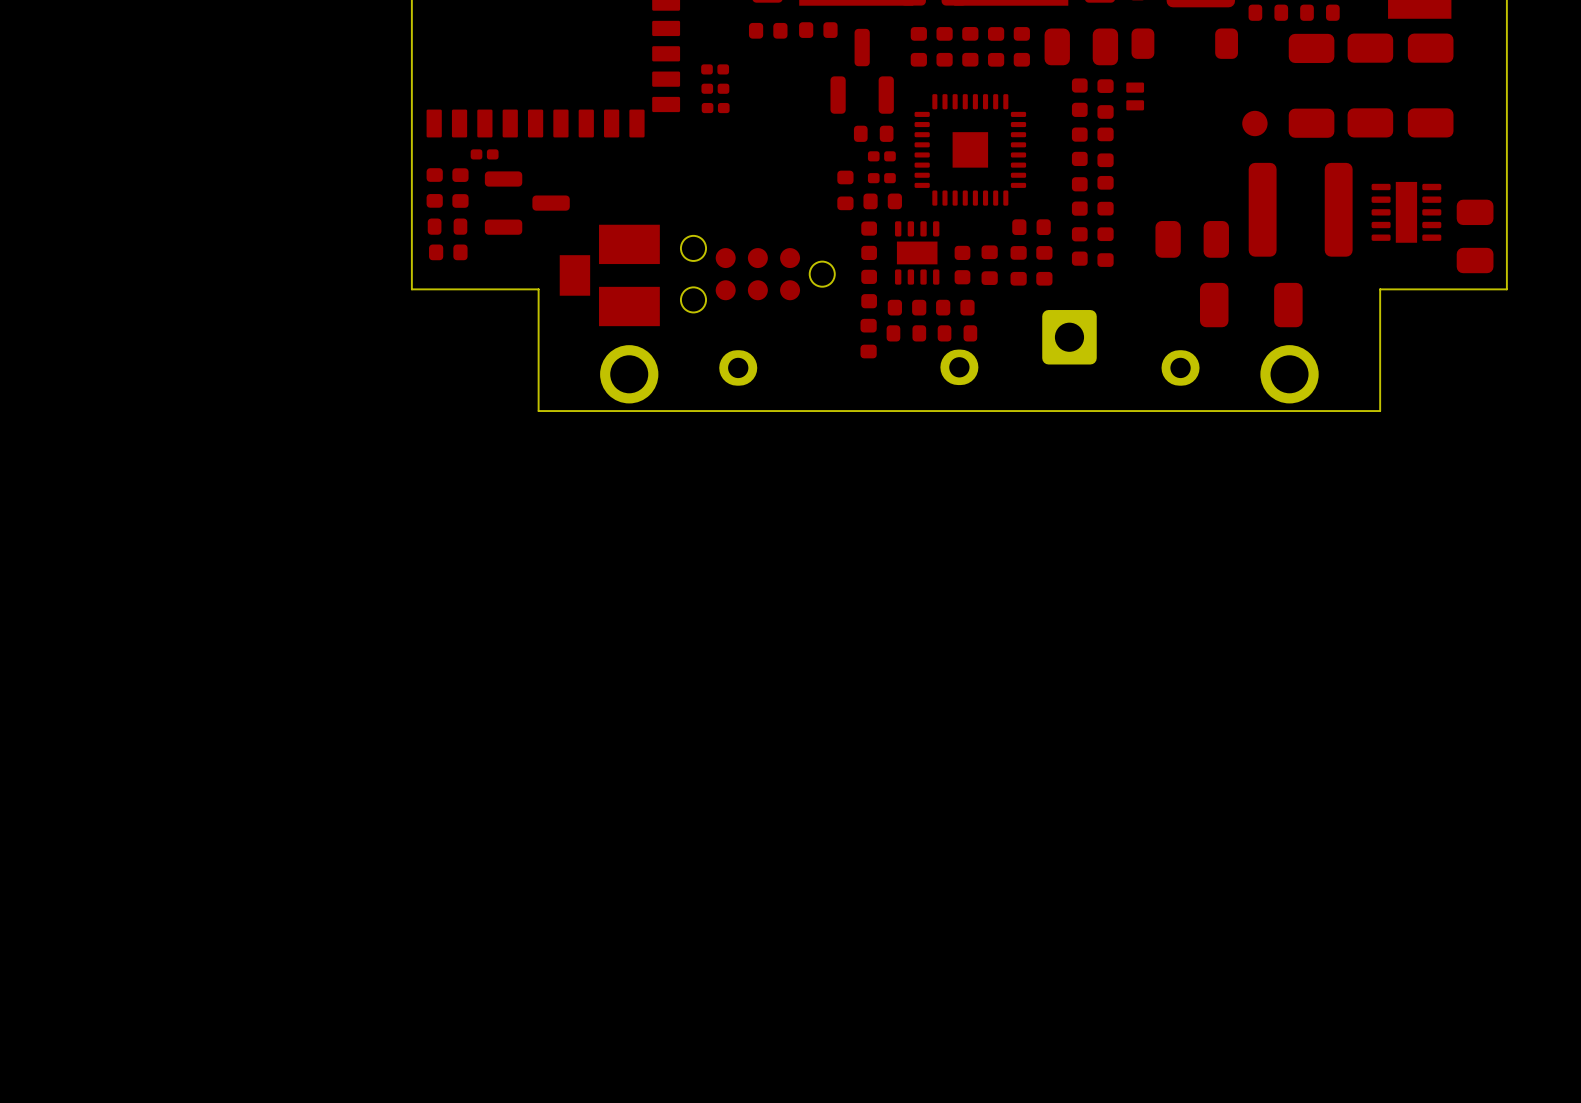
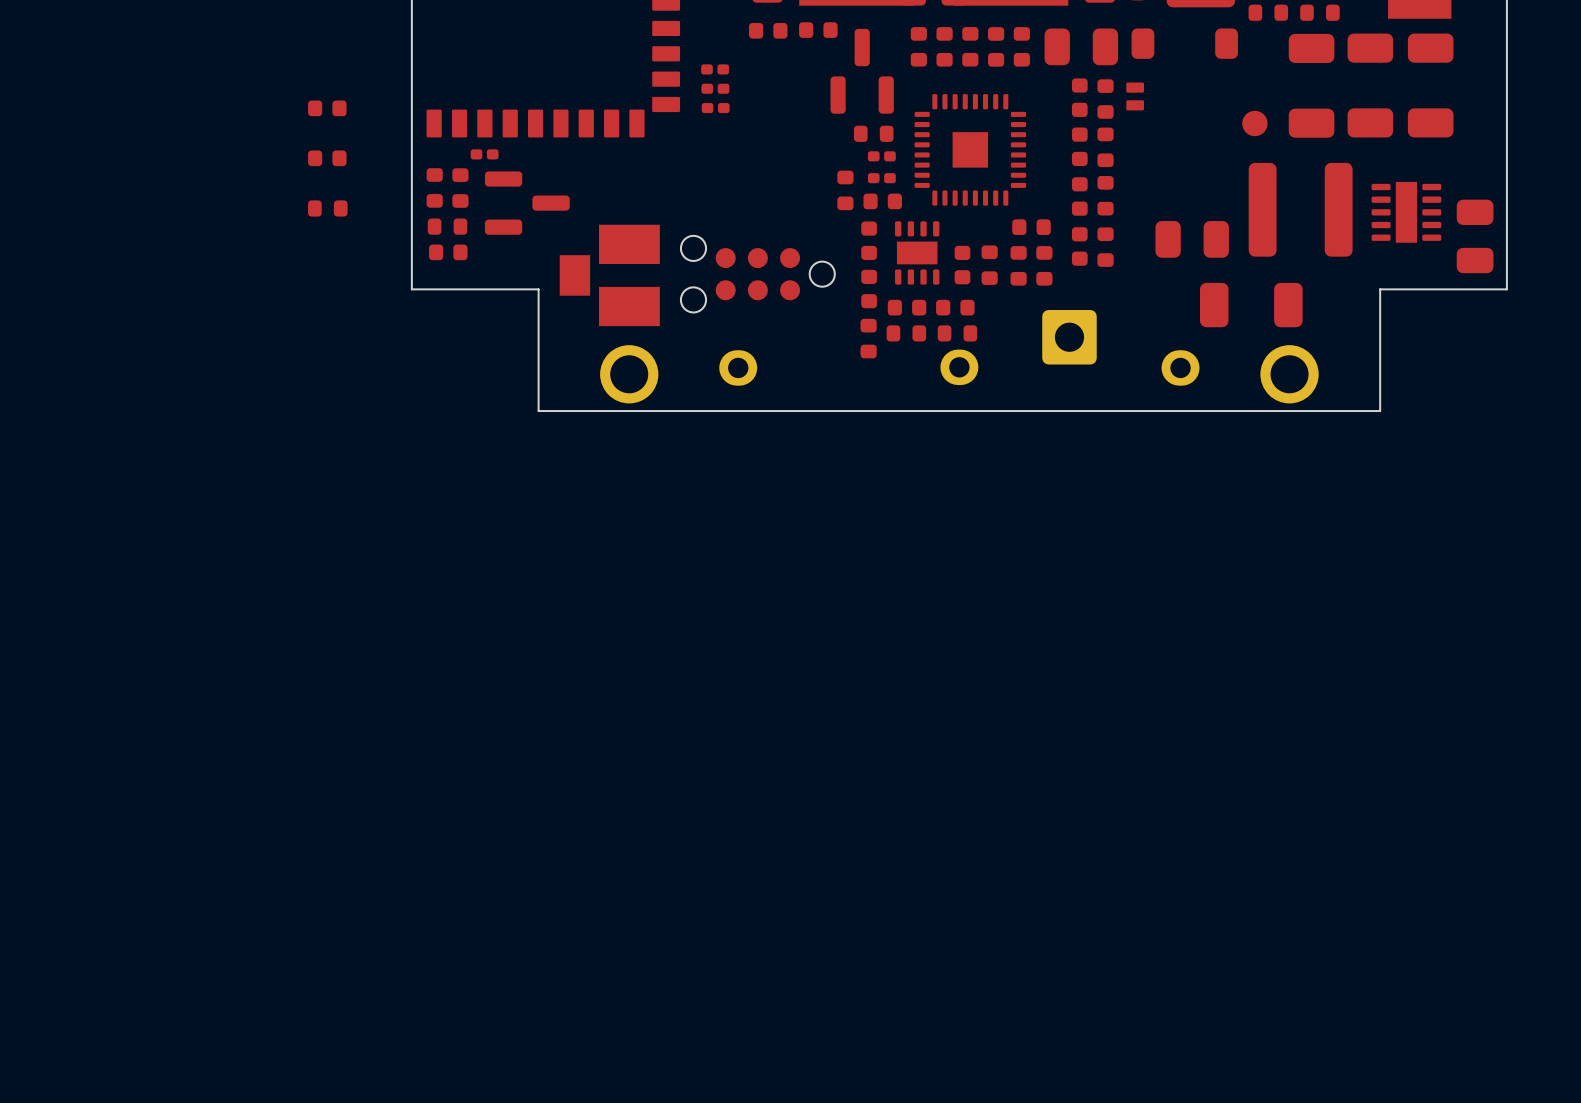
part: none -> (327, 108)
part: none -> (327, 158)
part: none -> (327, 208)

